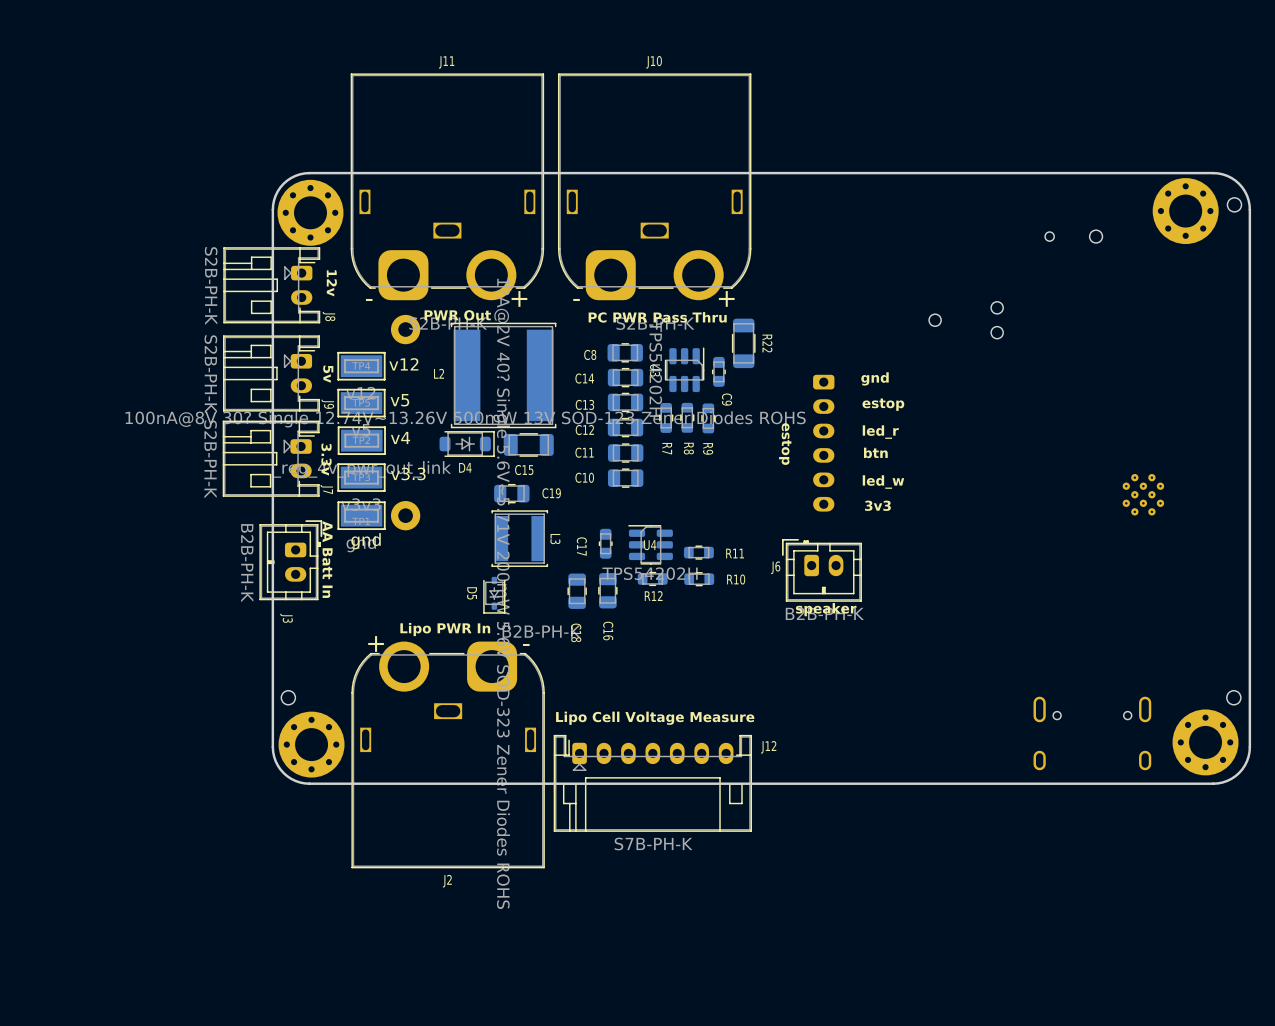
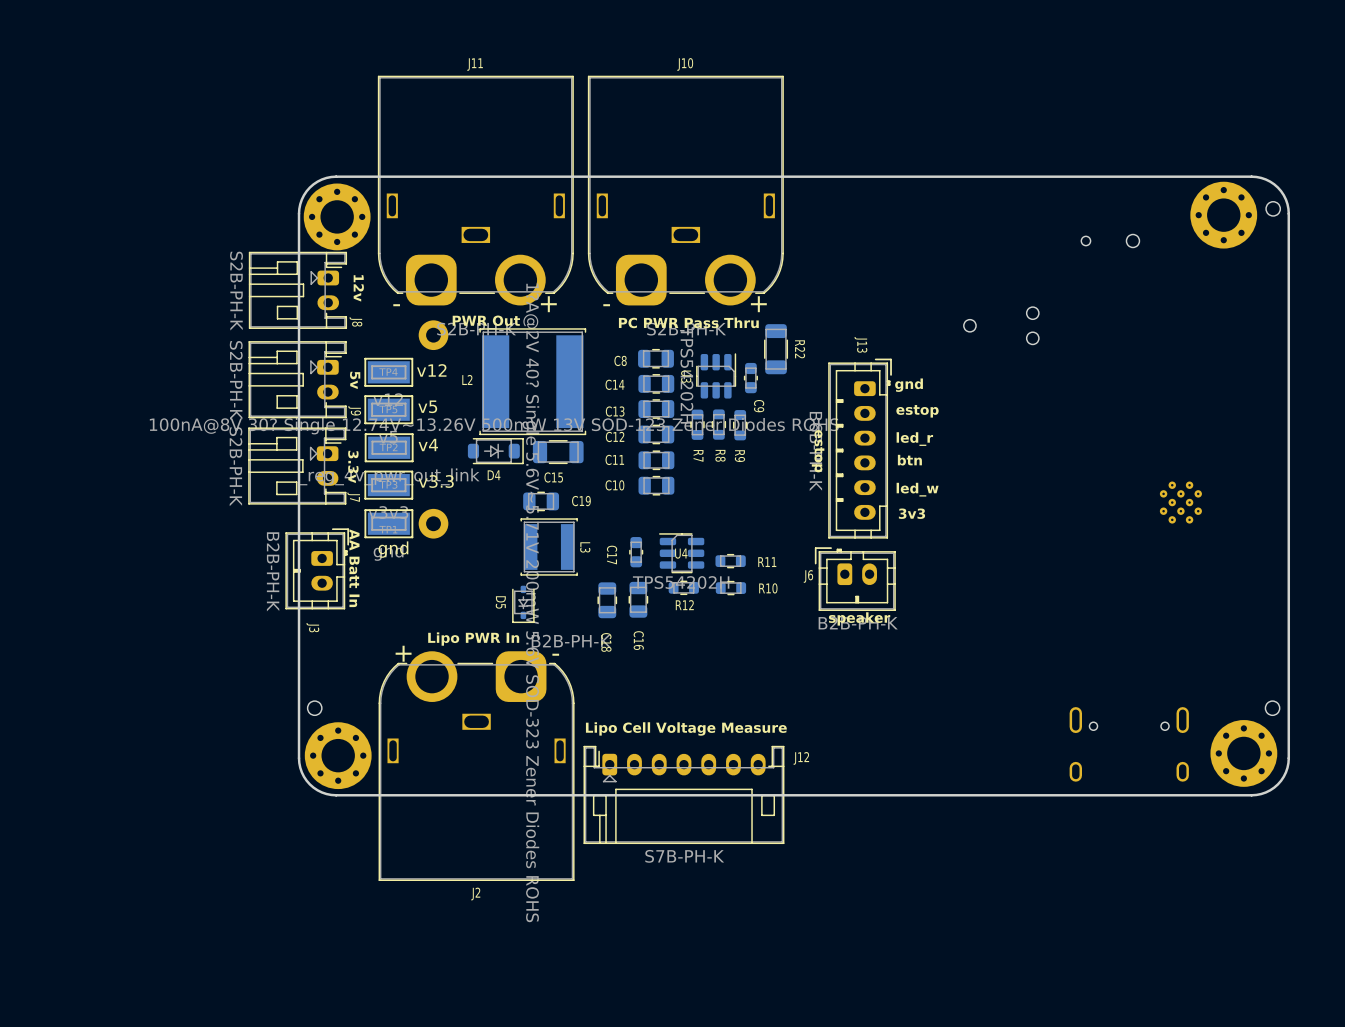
J13 side: top (823, 443) -> bottom (859, 448)

